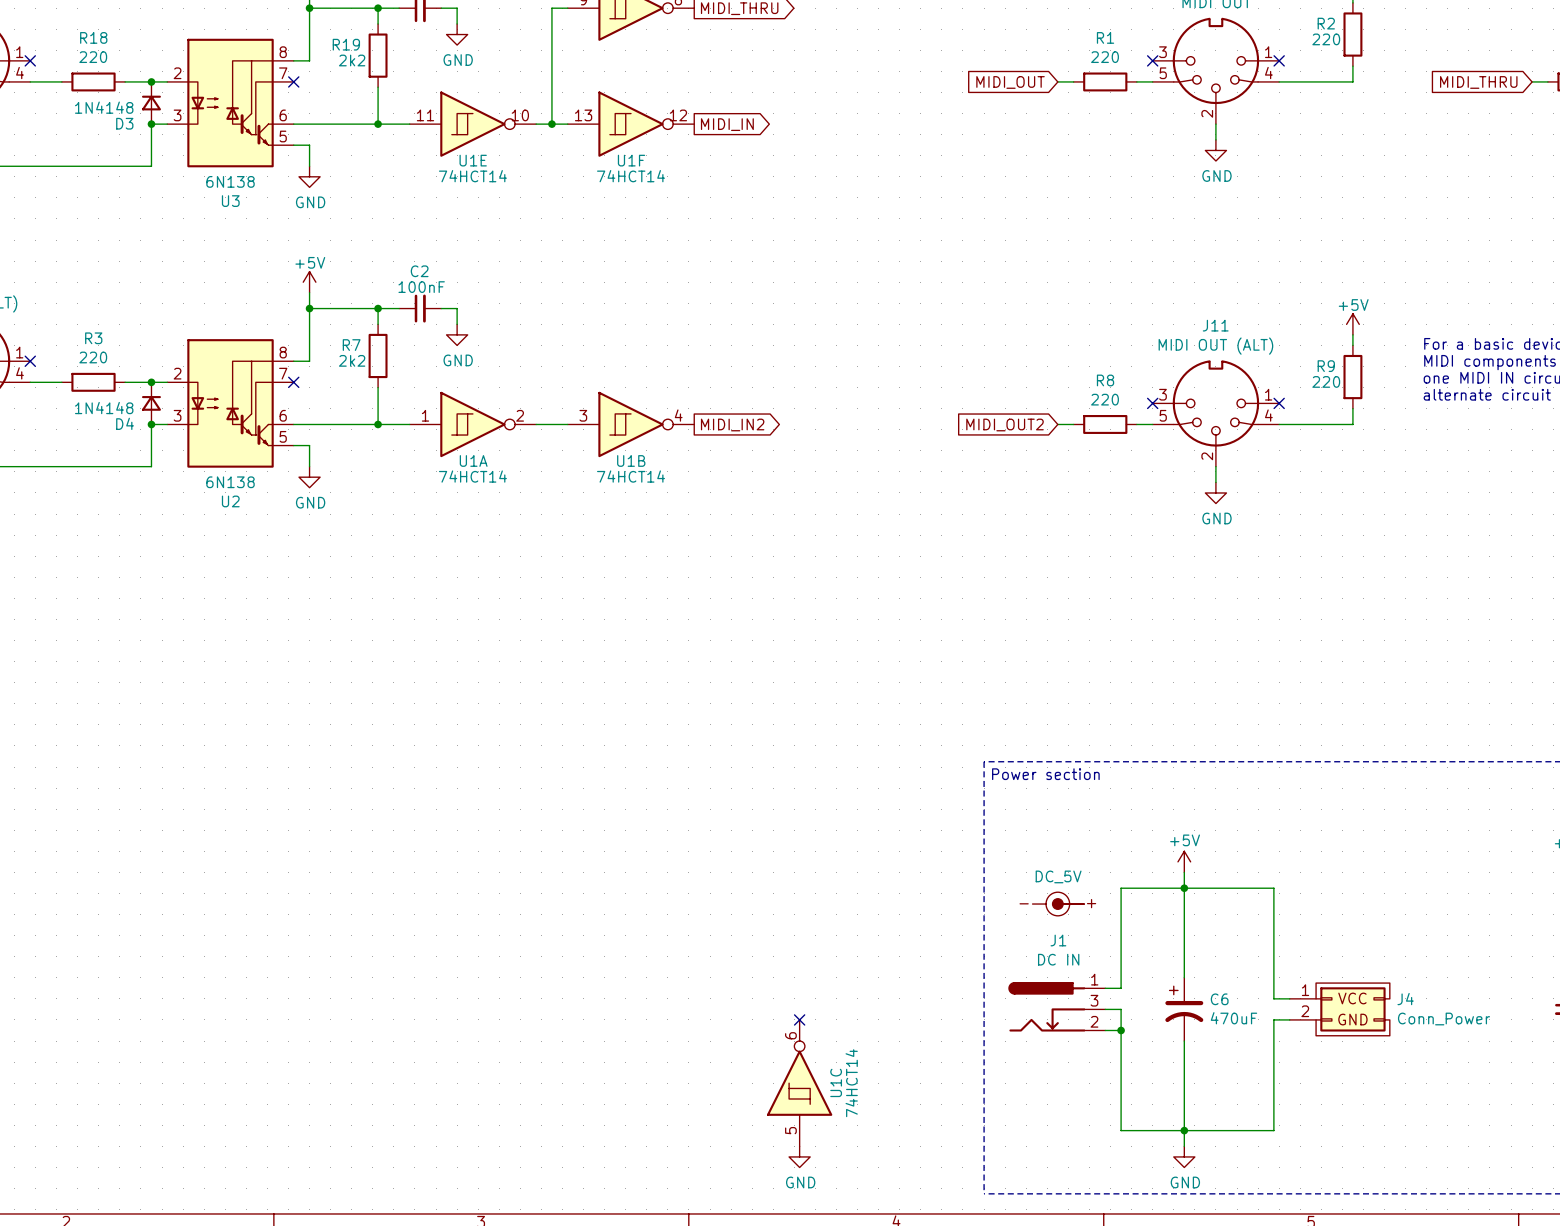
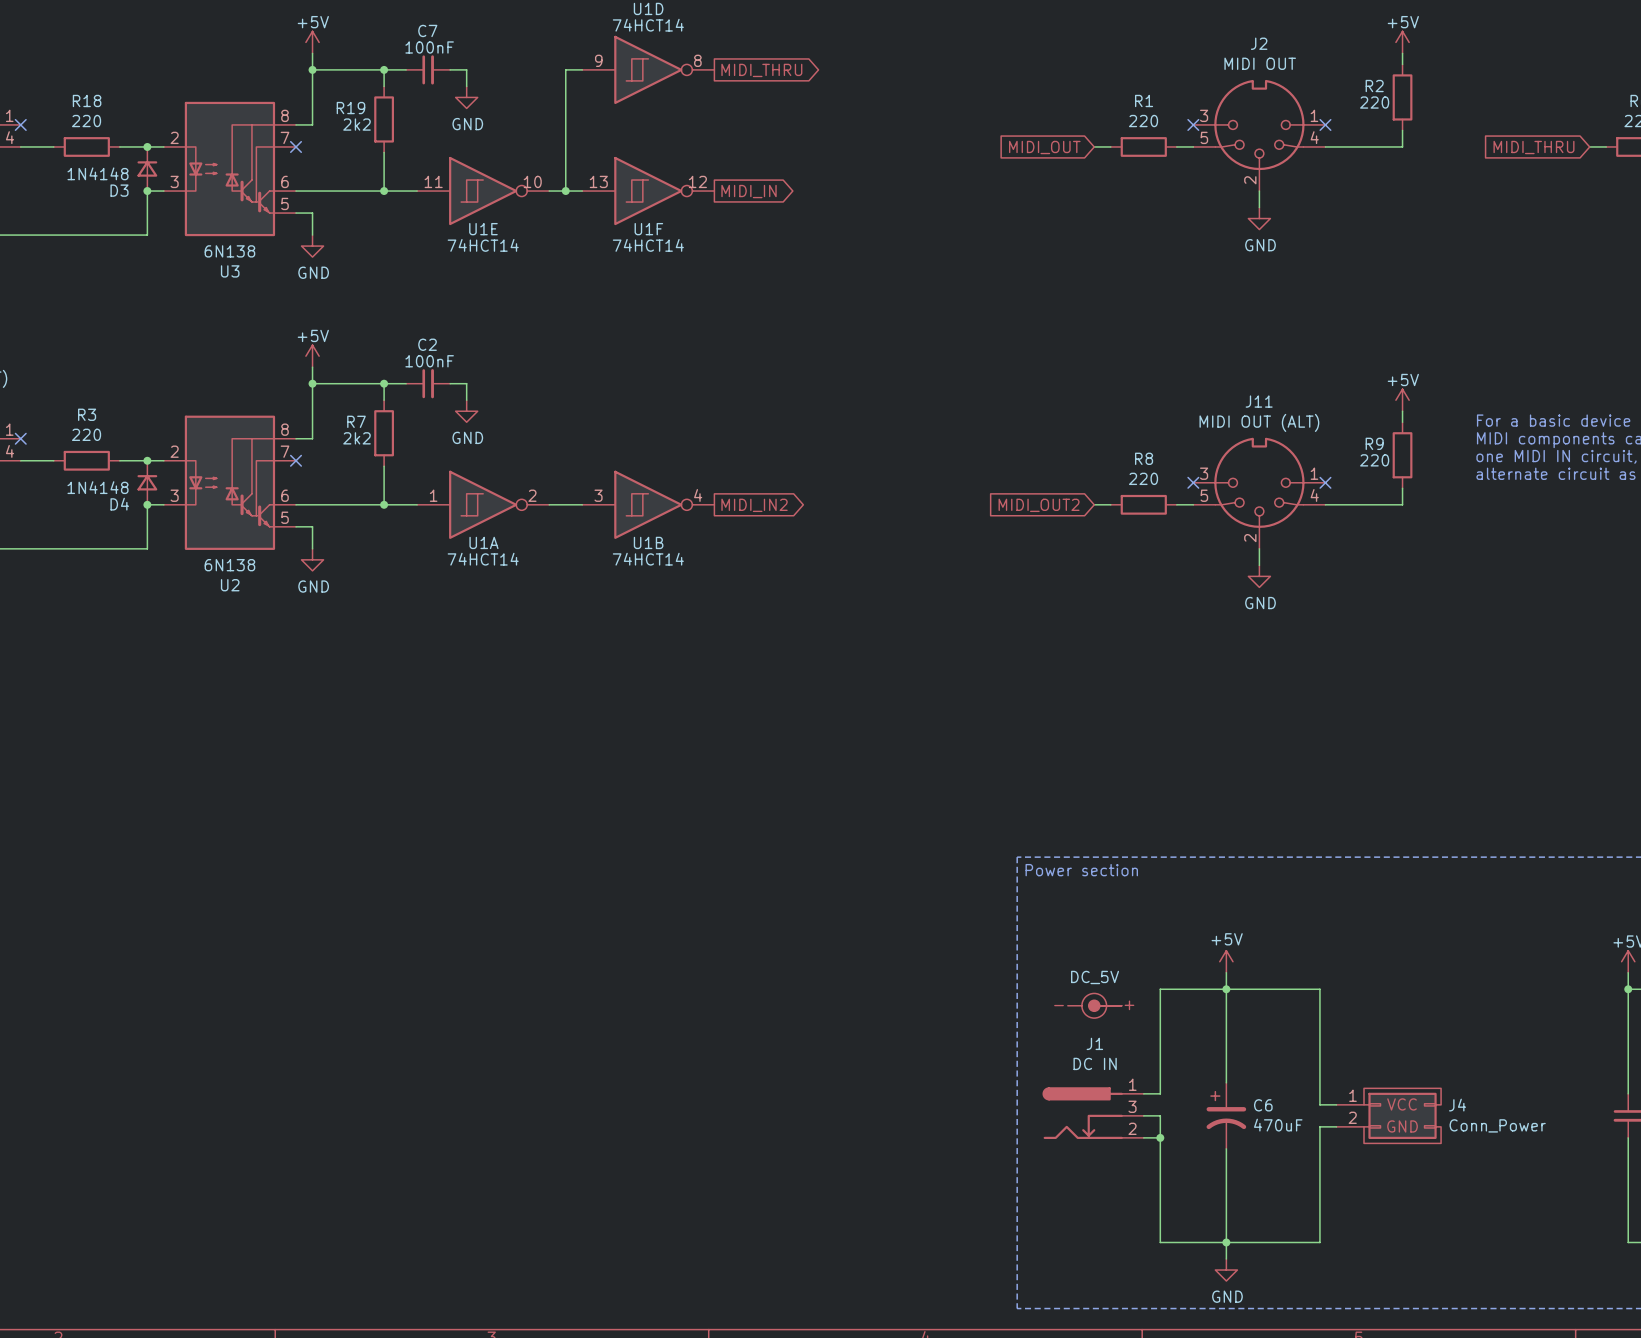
no-connect mark: (799, 1019) -> none
U1C: 74HCT14 (799, 1083) -> none
power symbol: GND (799, 1156) -> none

